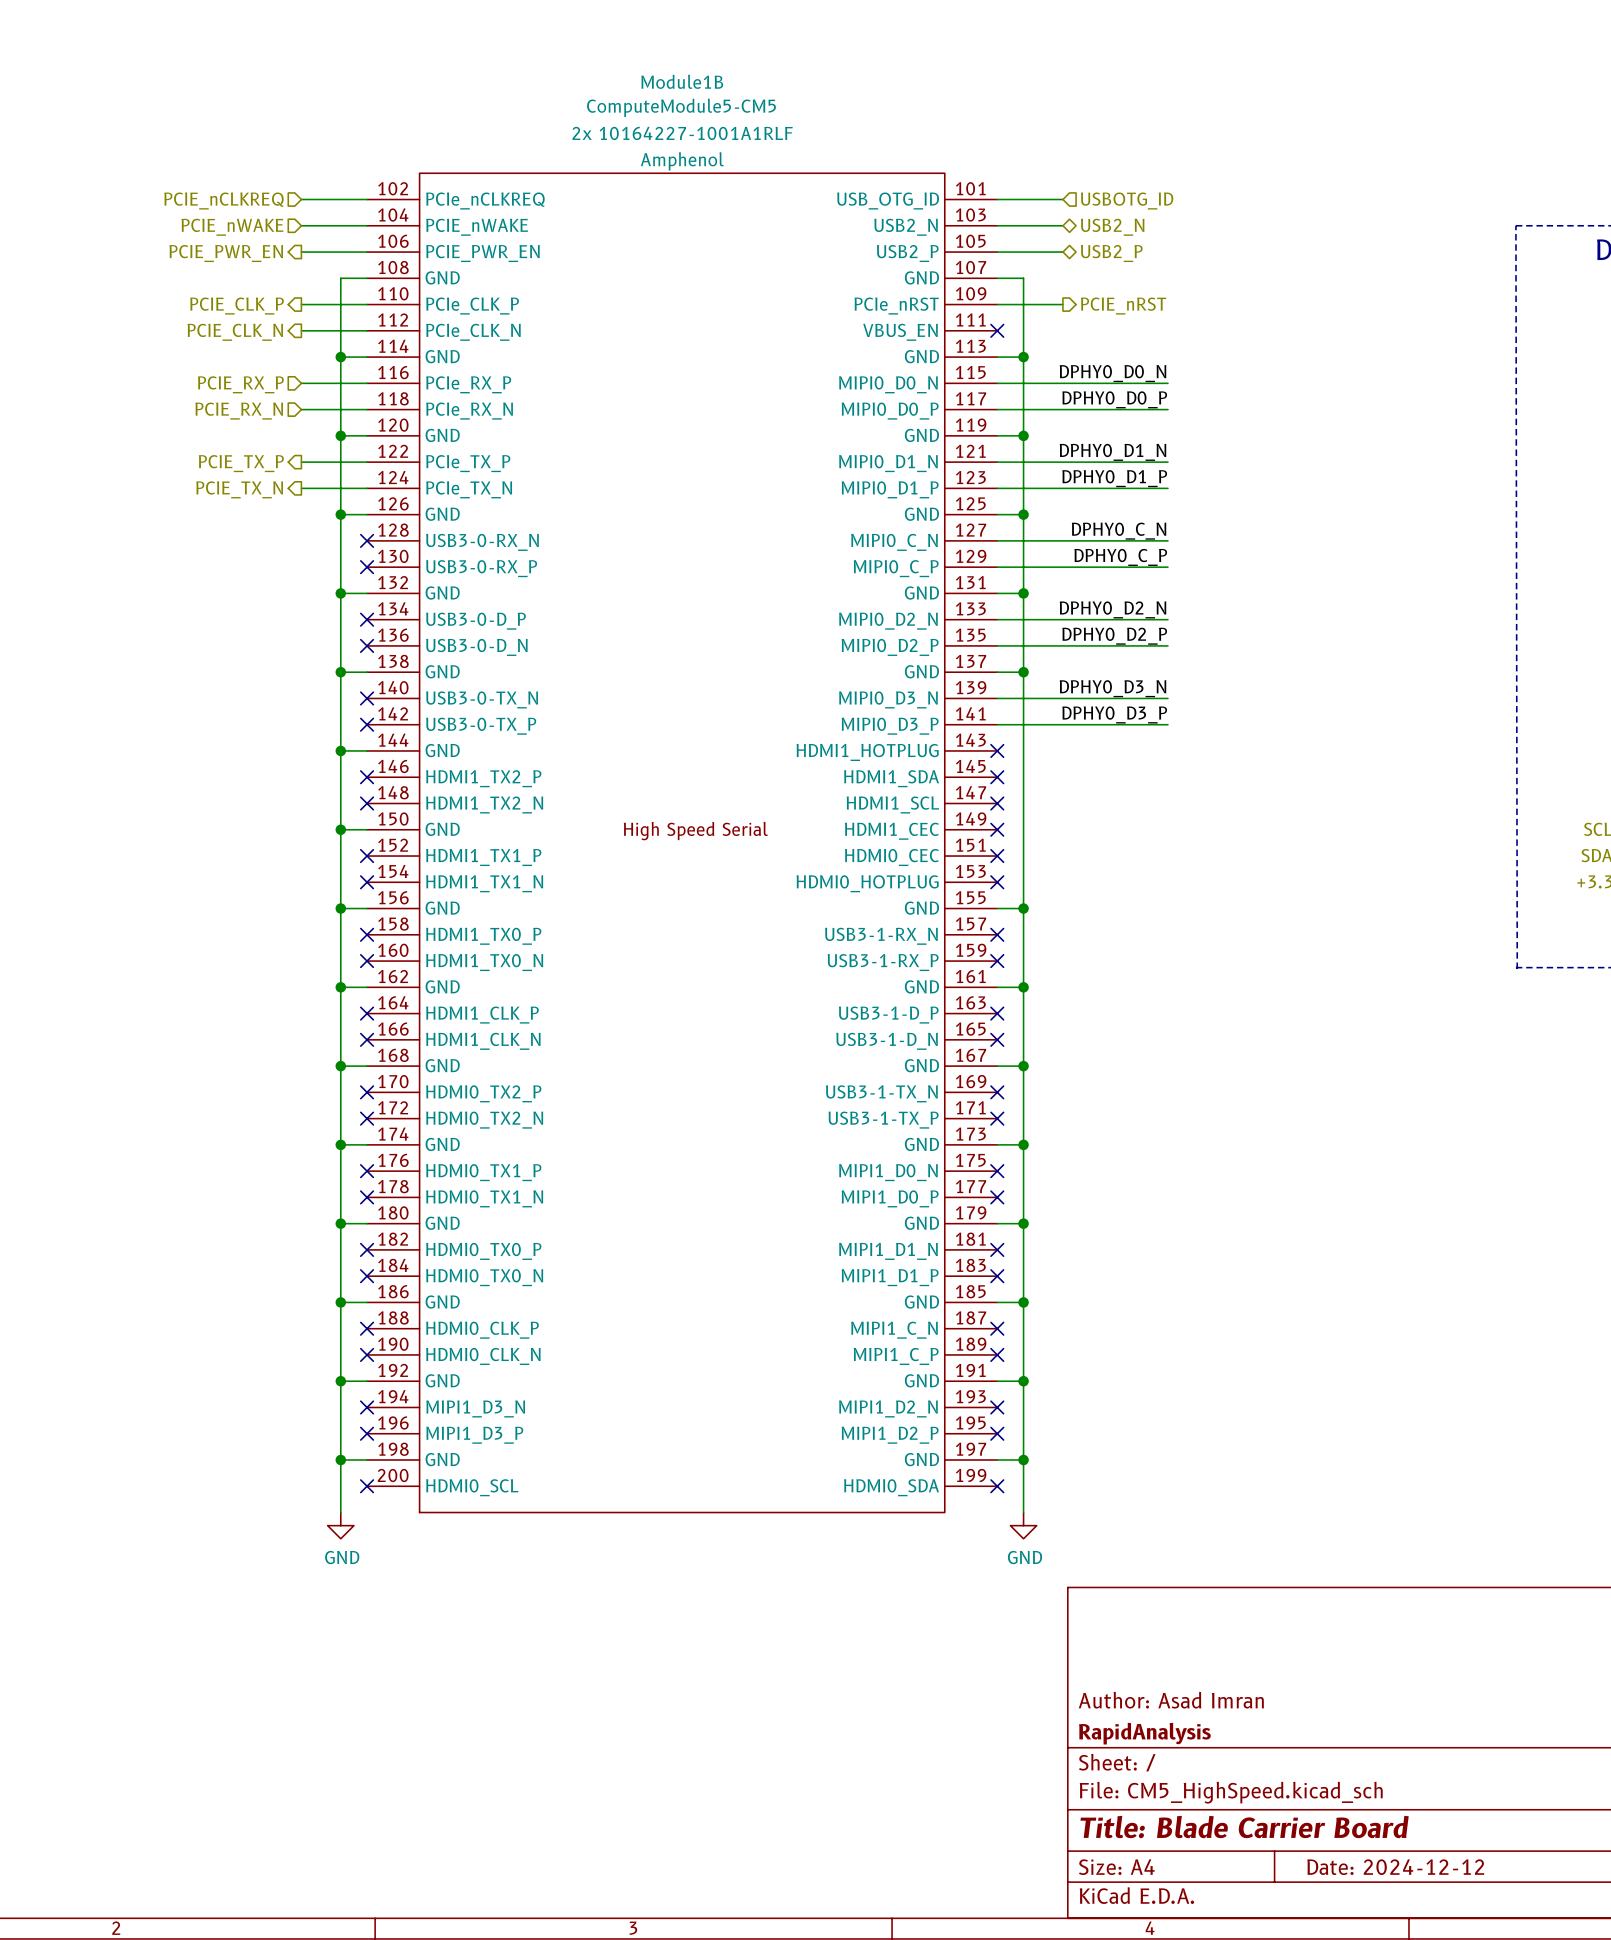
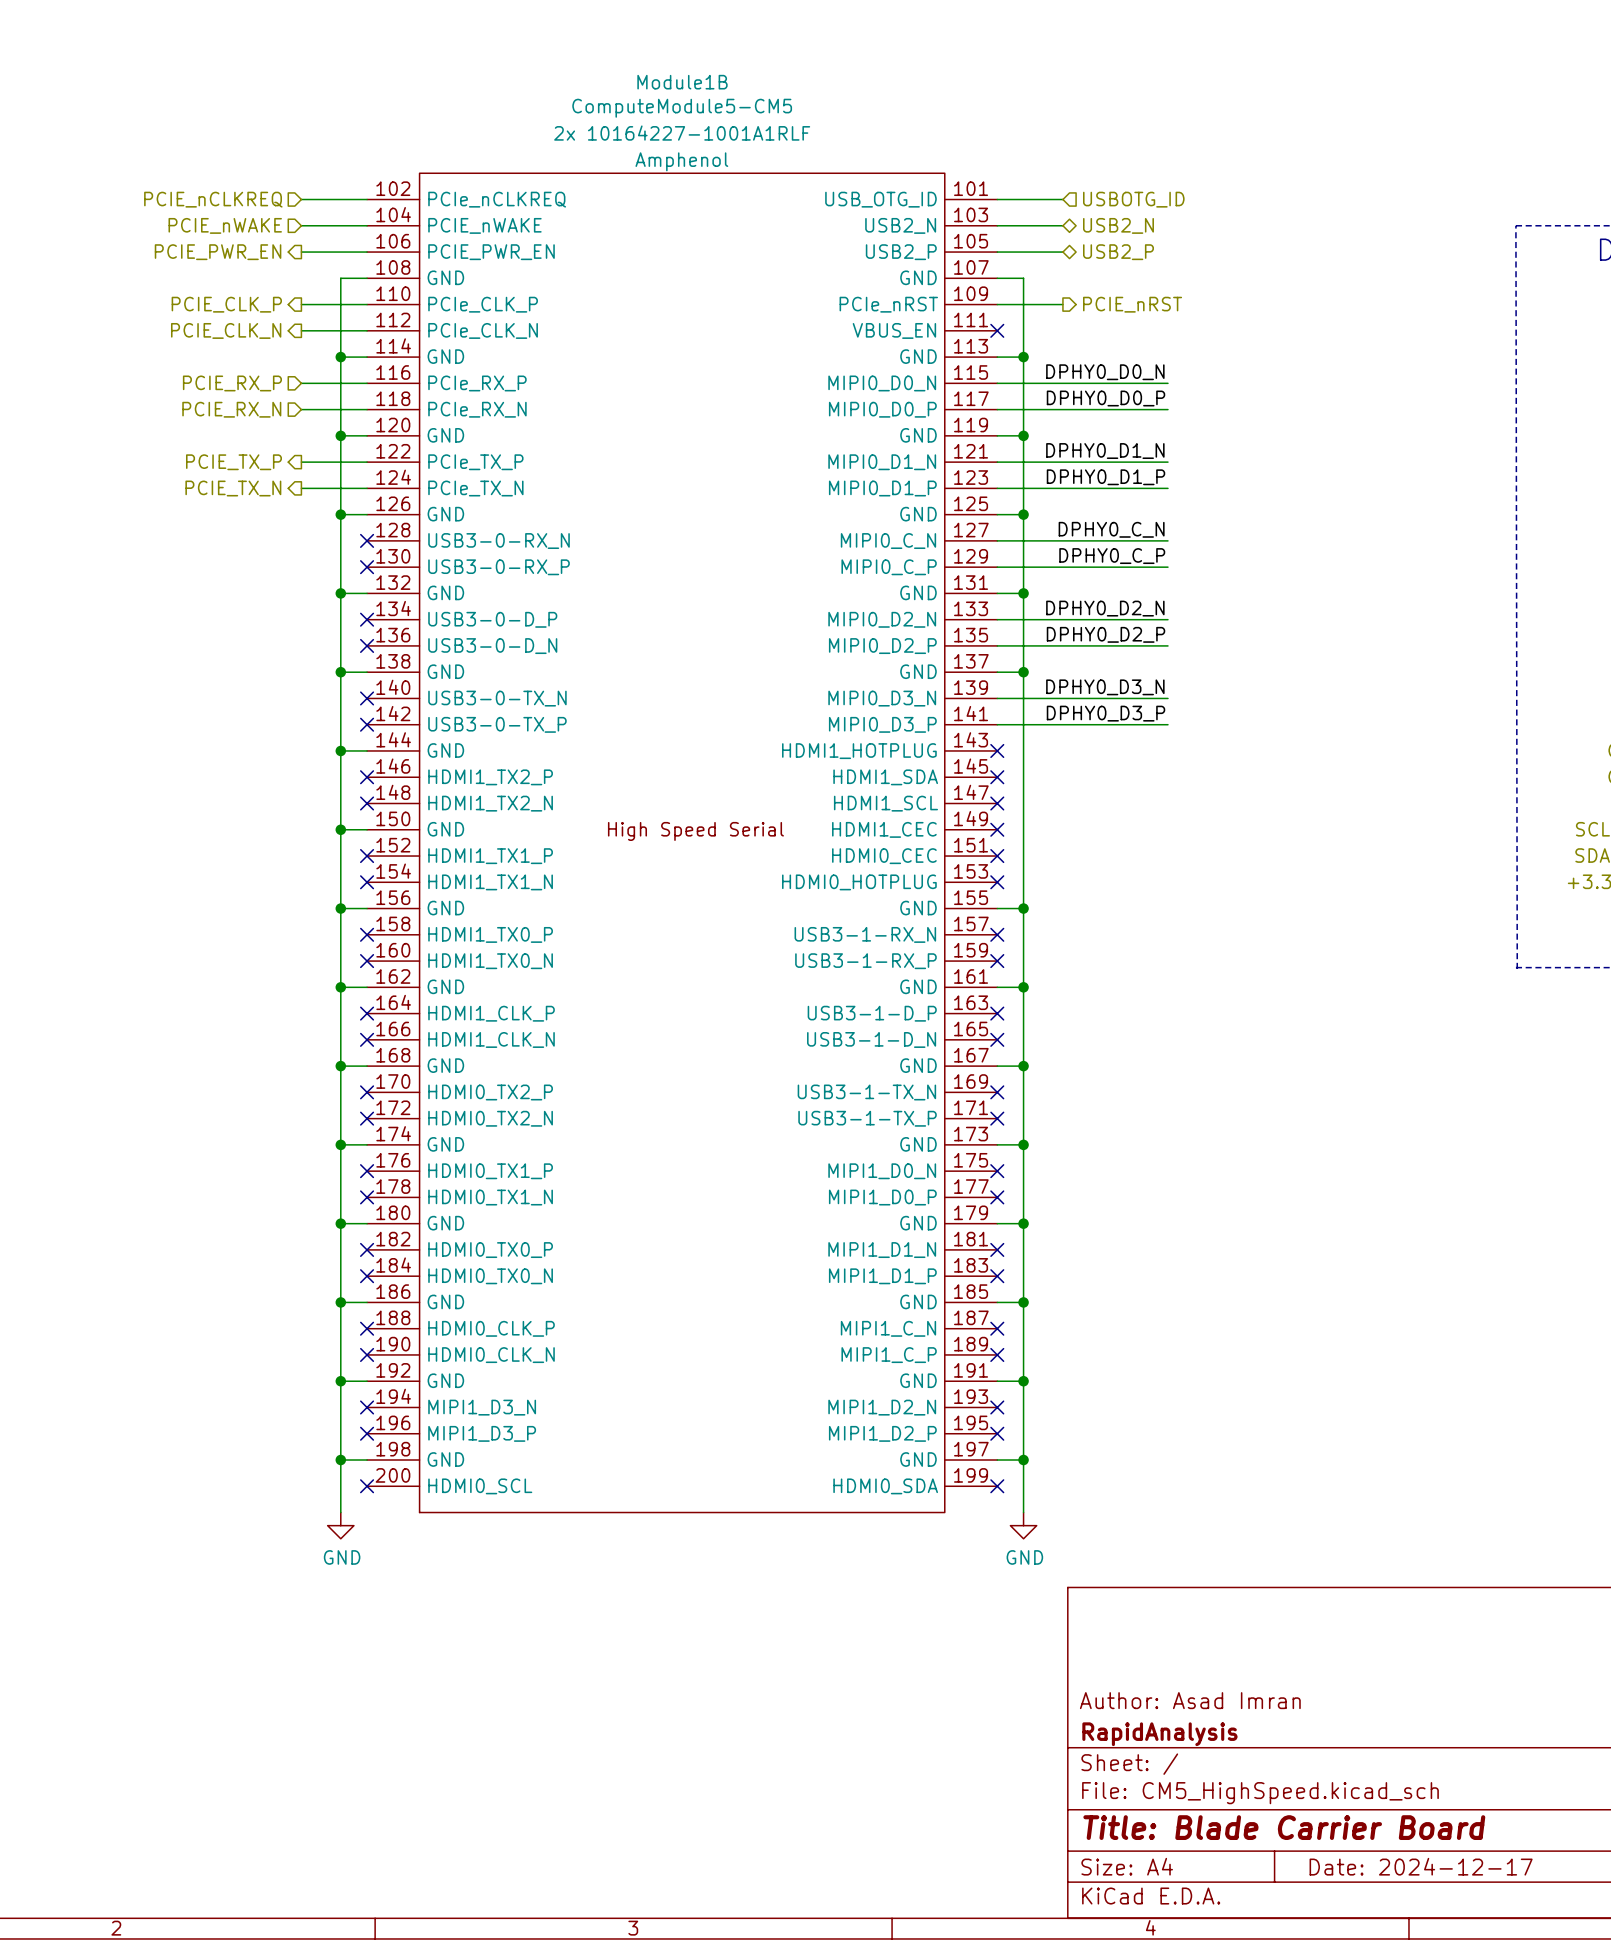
title block: Date: 2024-12-12 (1395, 1867) -> Date: 2024-12-17 (1421, 1866)

